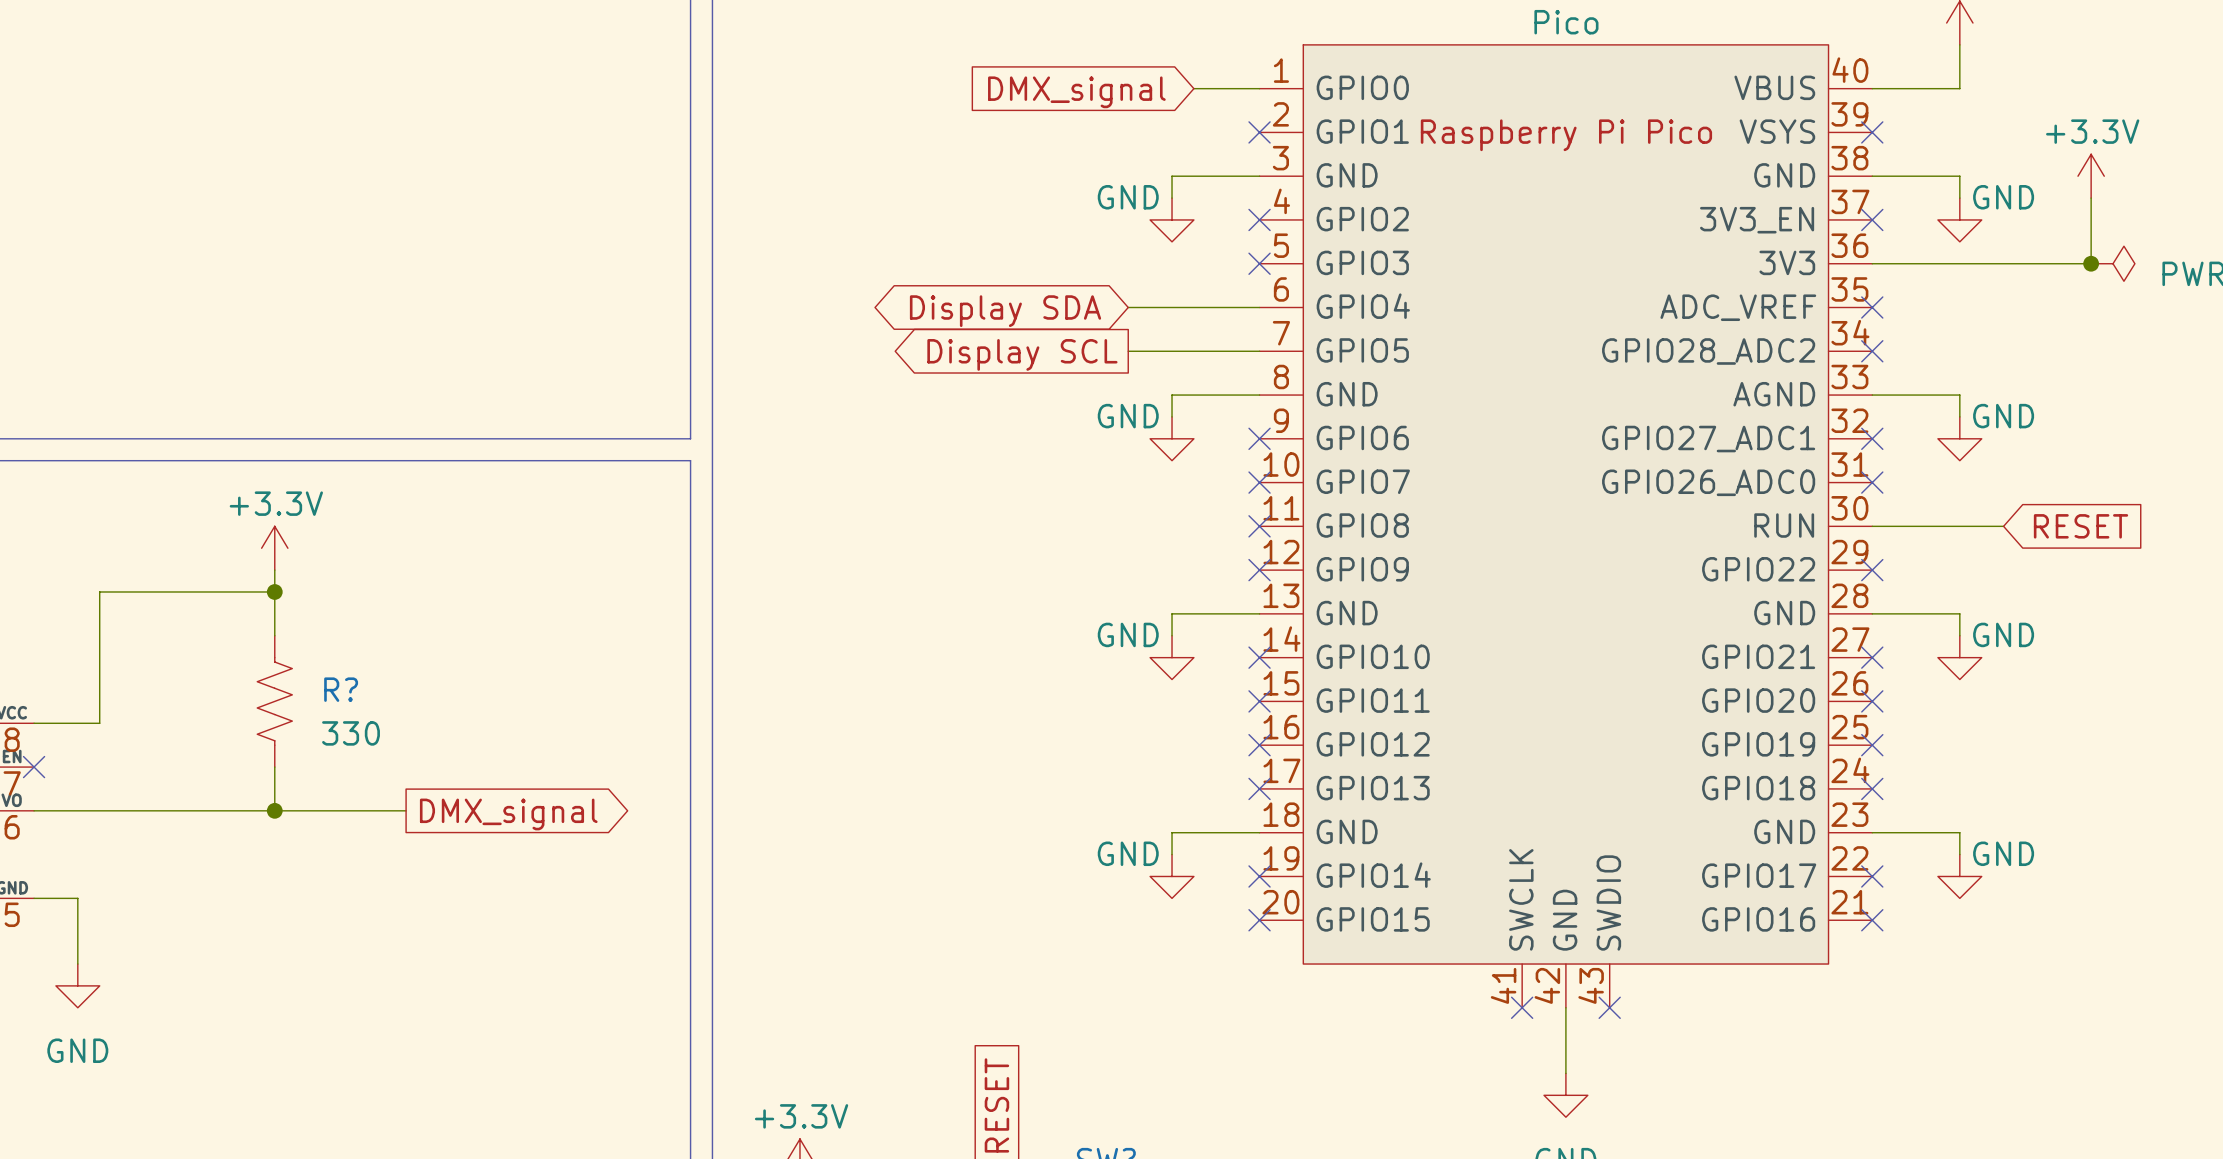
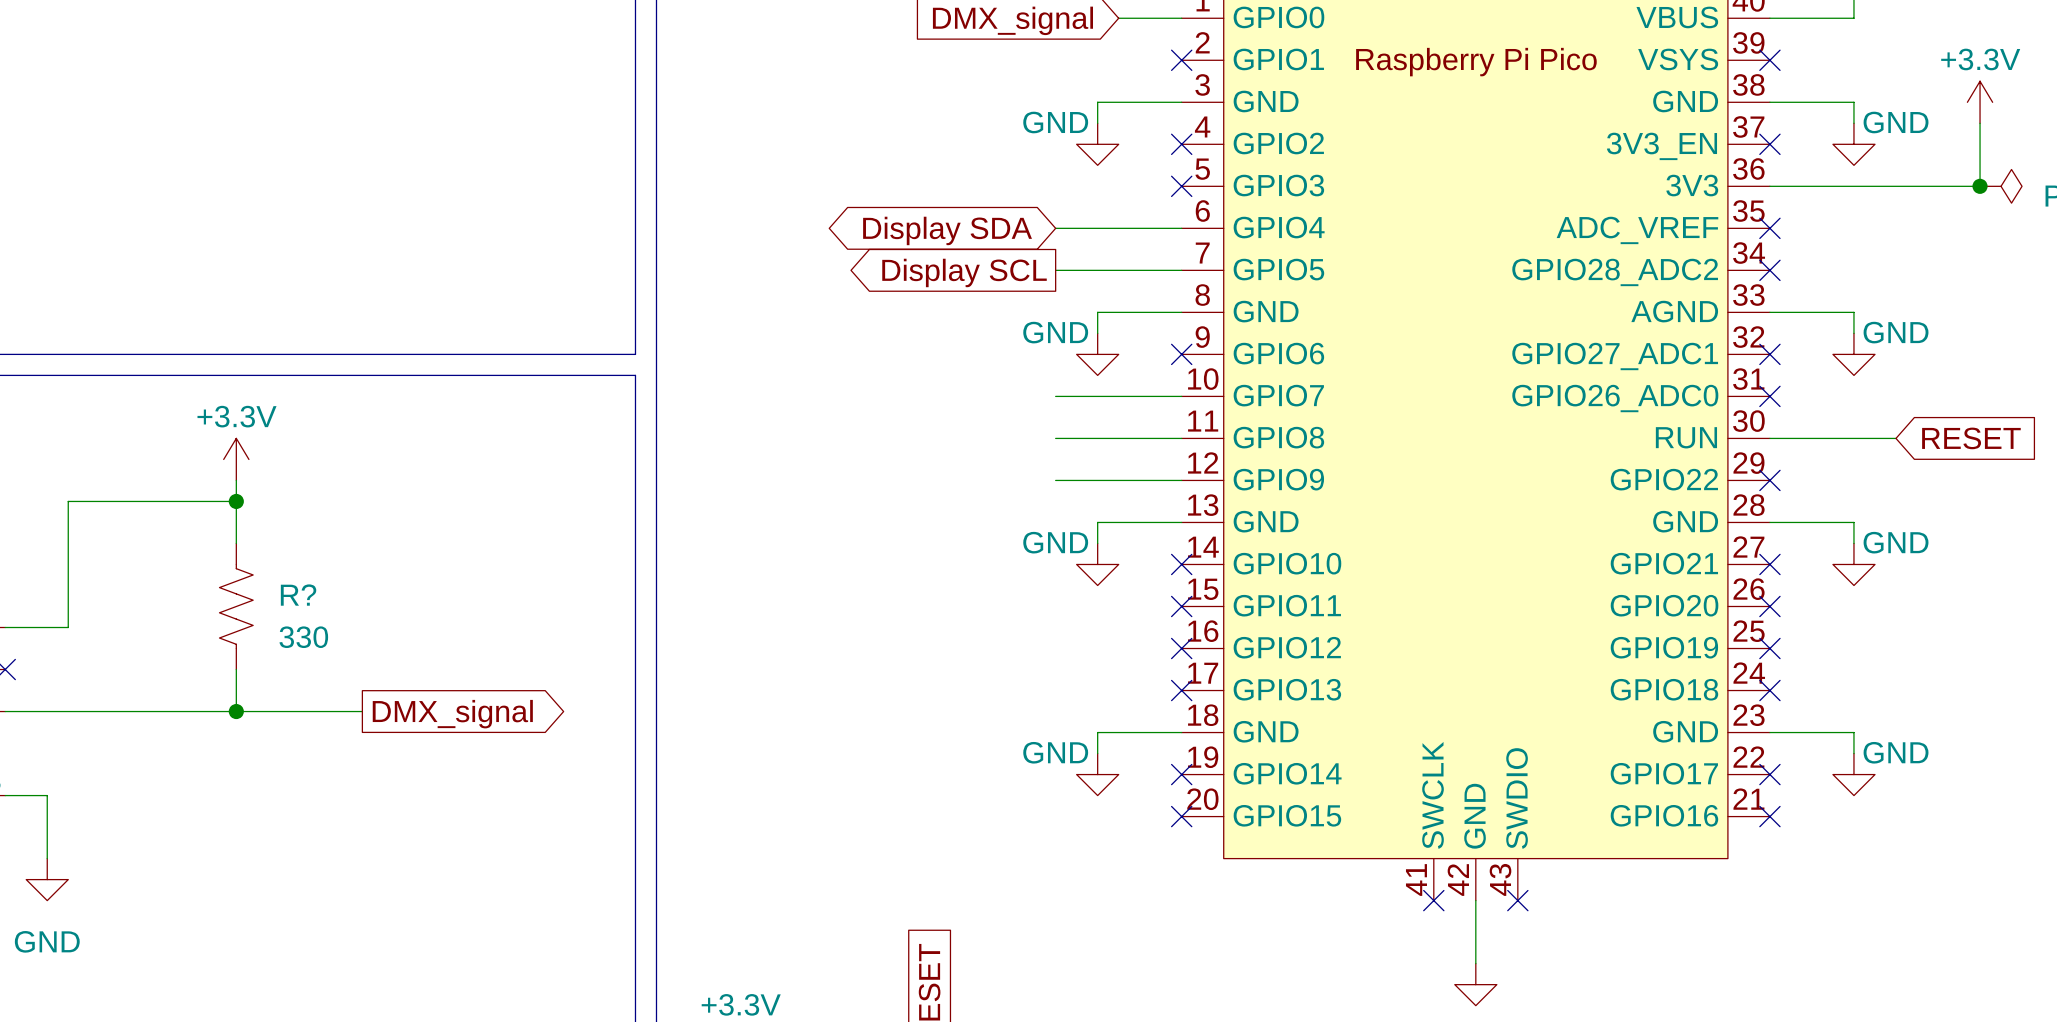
wire: none -> (1055, 396) (1181, 396)
no-connect mark: (1259, 482) -> none
wire: none -> (1055, 438) (1181, 438)
no-connect mark: (1259, 526) -> none
wire: none -> (1055, 480) (1181, 480)
no-connect mark: (1259, 570) -> none

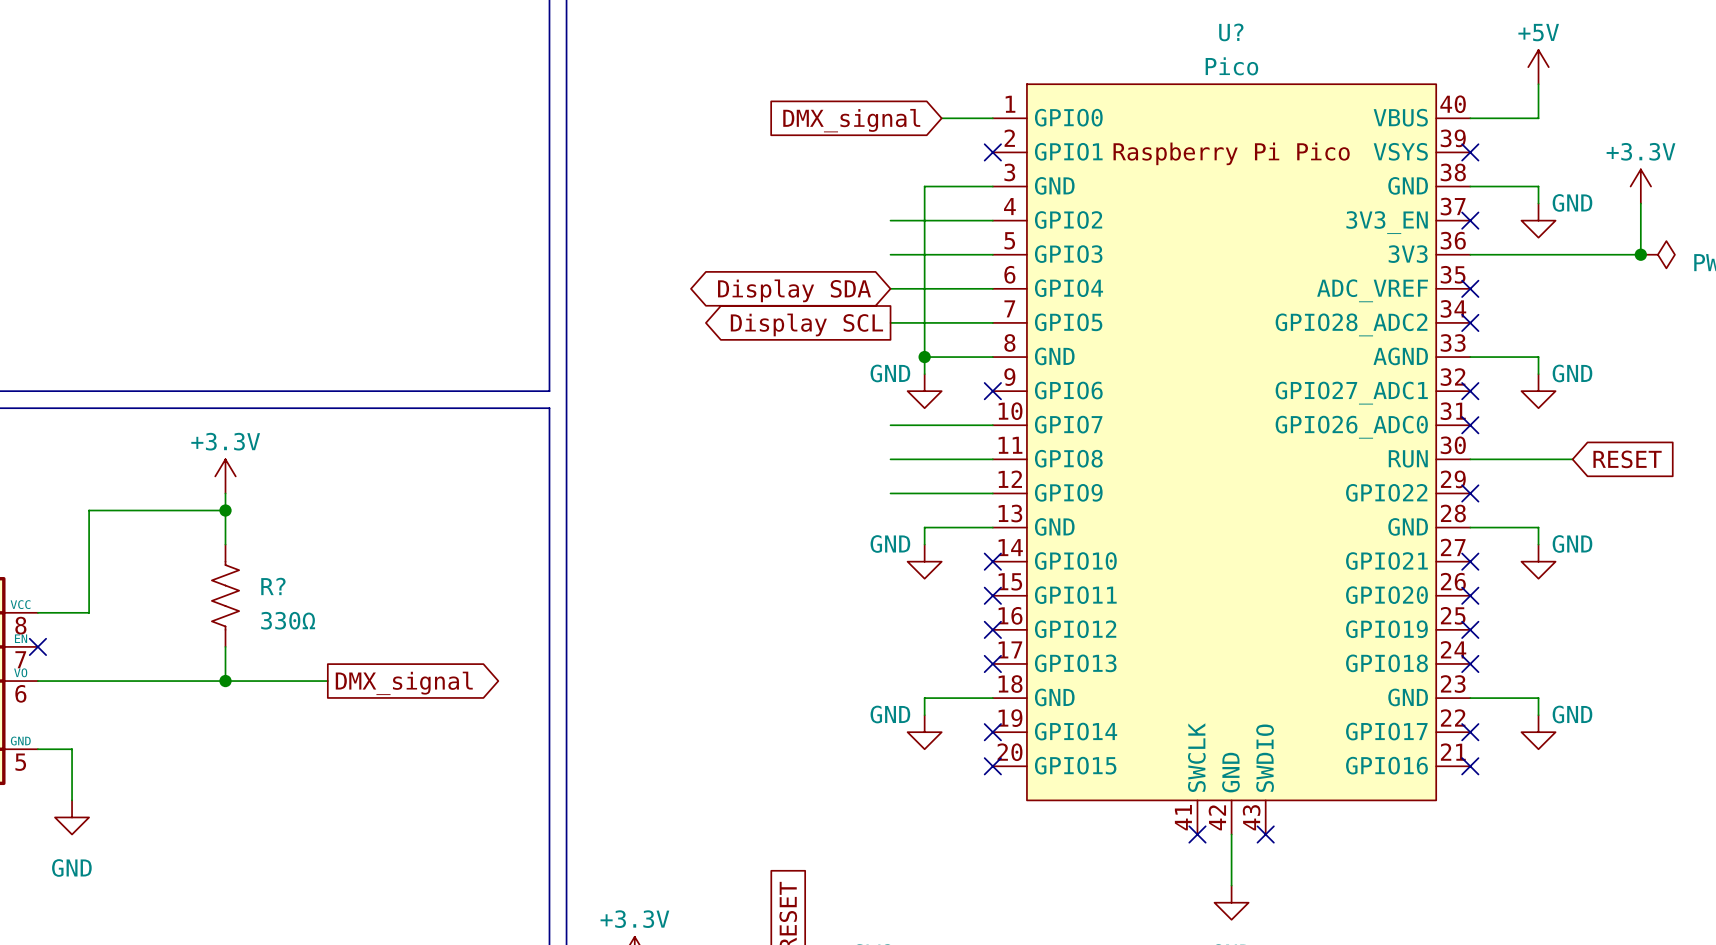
wire: none -> (924, 203) (924, 357)
wire: none -> (890, 220) (992, 220)
power symbol: GND (1097, 144) -> none
no-connect mark: (1181, 144) -> none
wire: none -> (890, 254) (992, 254)
no-connect mark: (1181, 186) -> none
junction: none -> (924, 357)
R? value: 330 (303, 637) -> 330Ω (288, 620)

